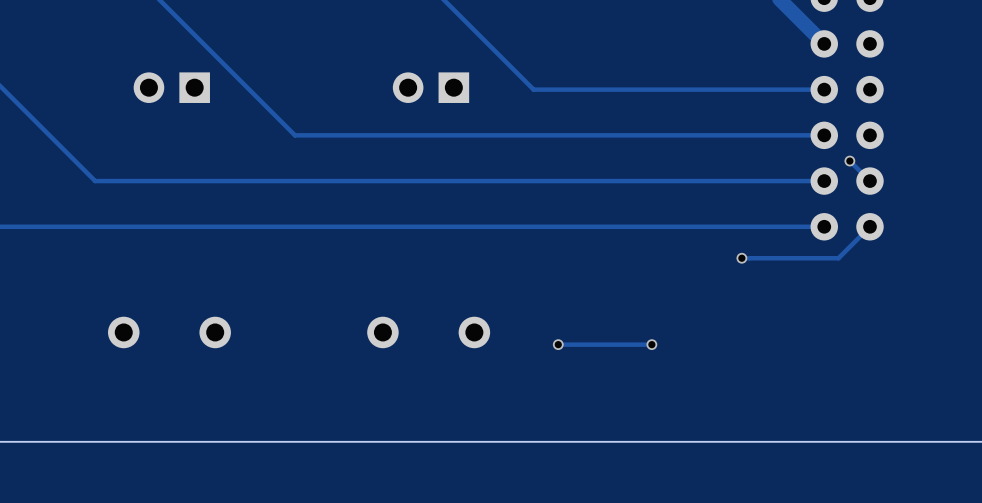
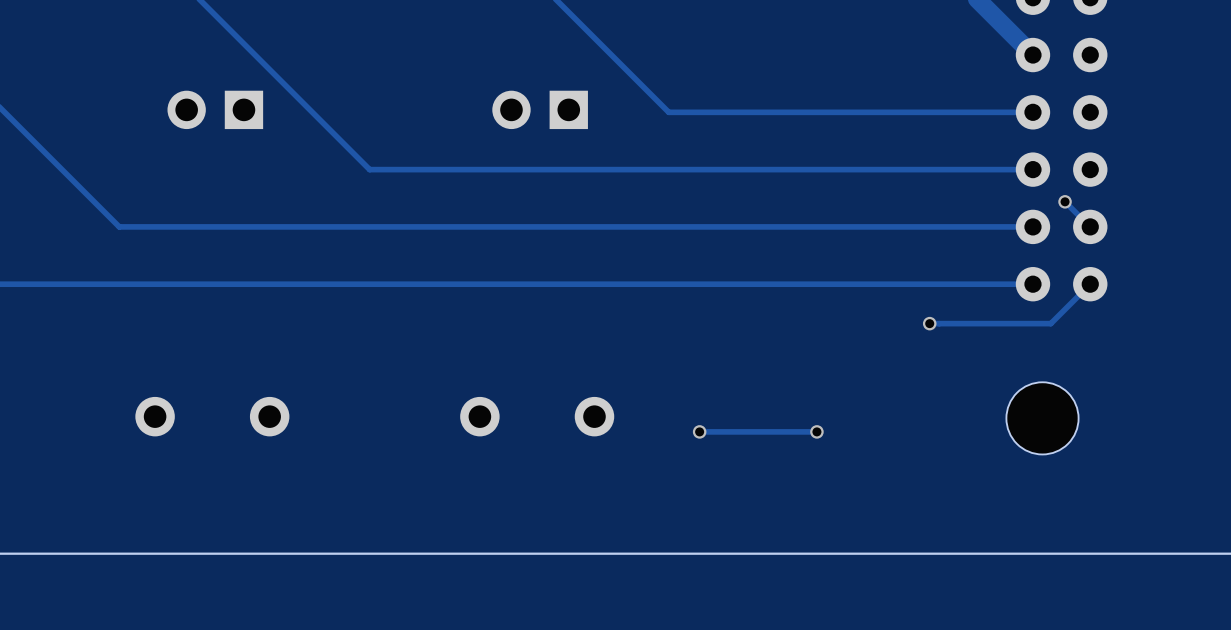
part: none -> (1042, 418)

